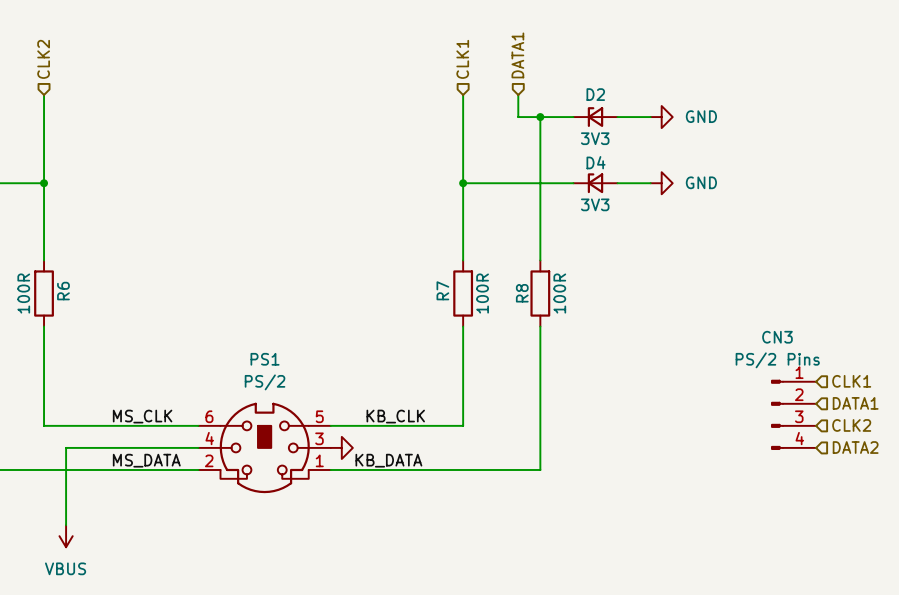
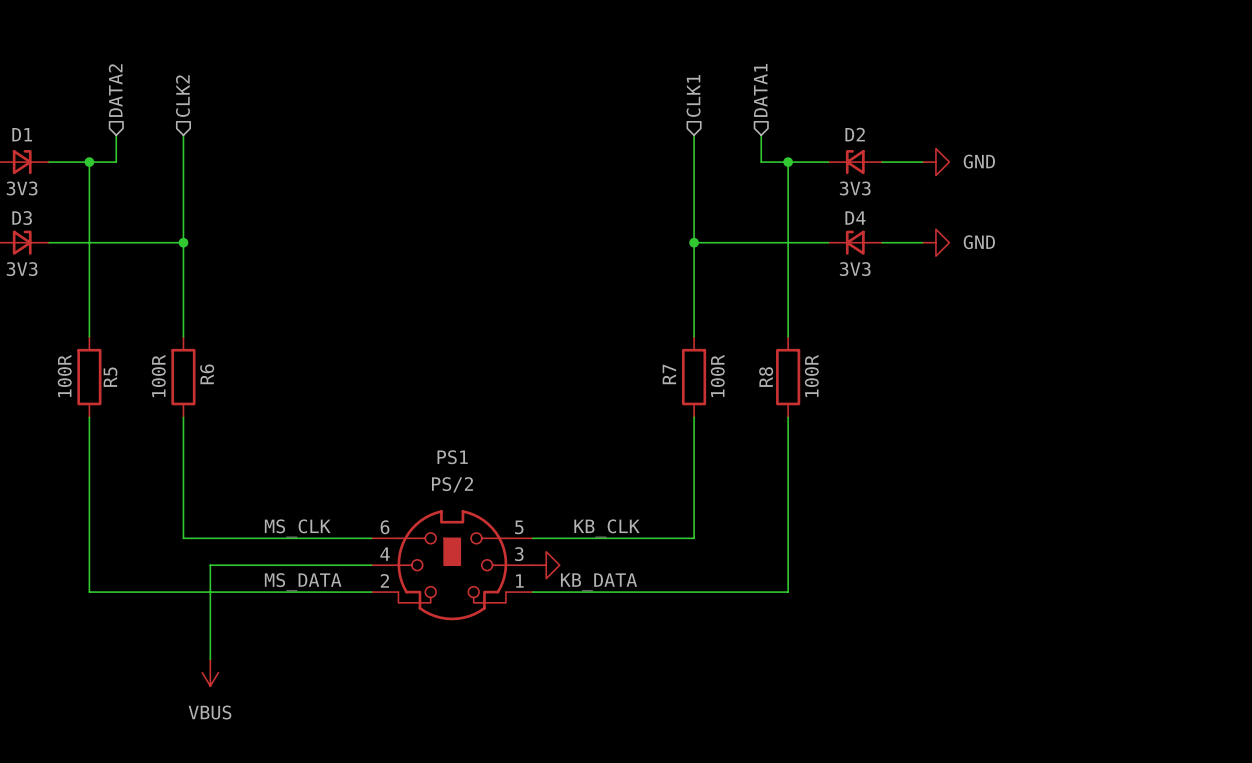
hierarchical label: CLK1 (851, 381) -> none
hierarchical label: DATA1 (855, 403) -> none
CN3: PS/2 Pins (793, 414) -> none
hierarchical label: CLK2 (851, 425) -> none
hierarchical label: DATA2 (855, 447) -> none

